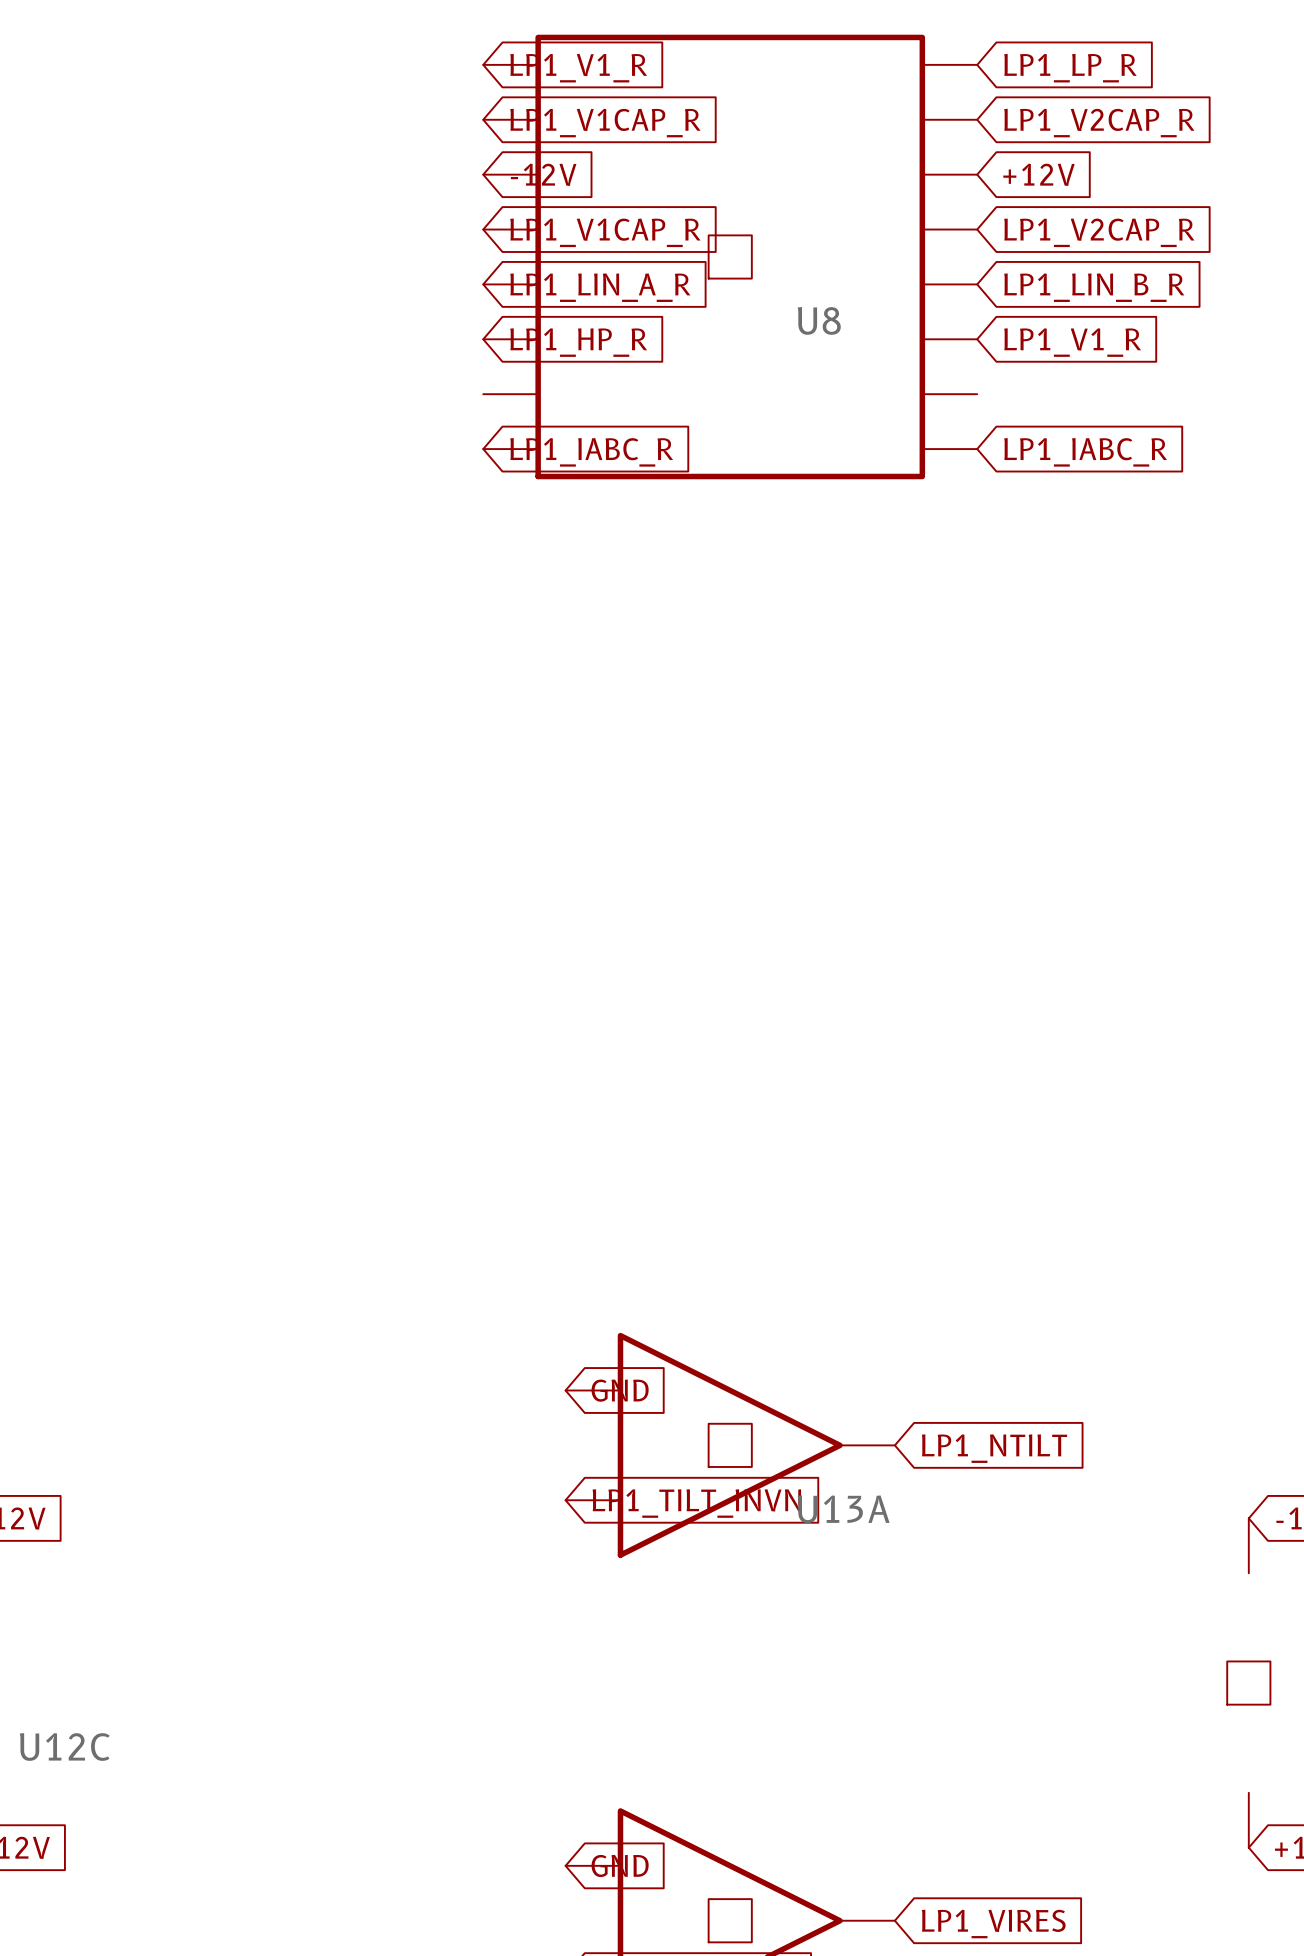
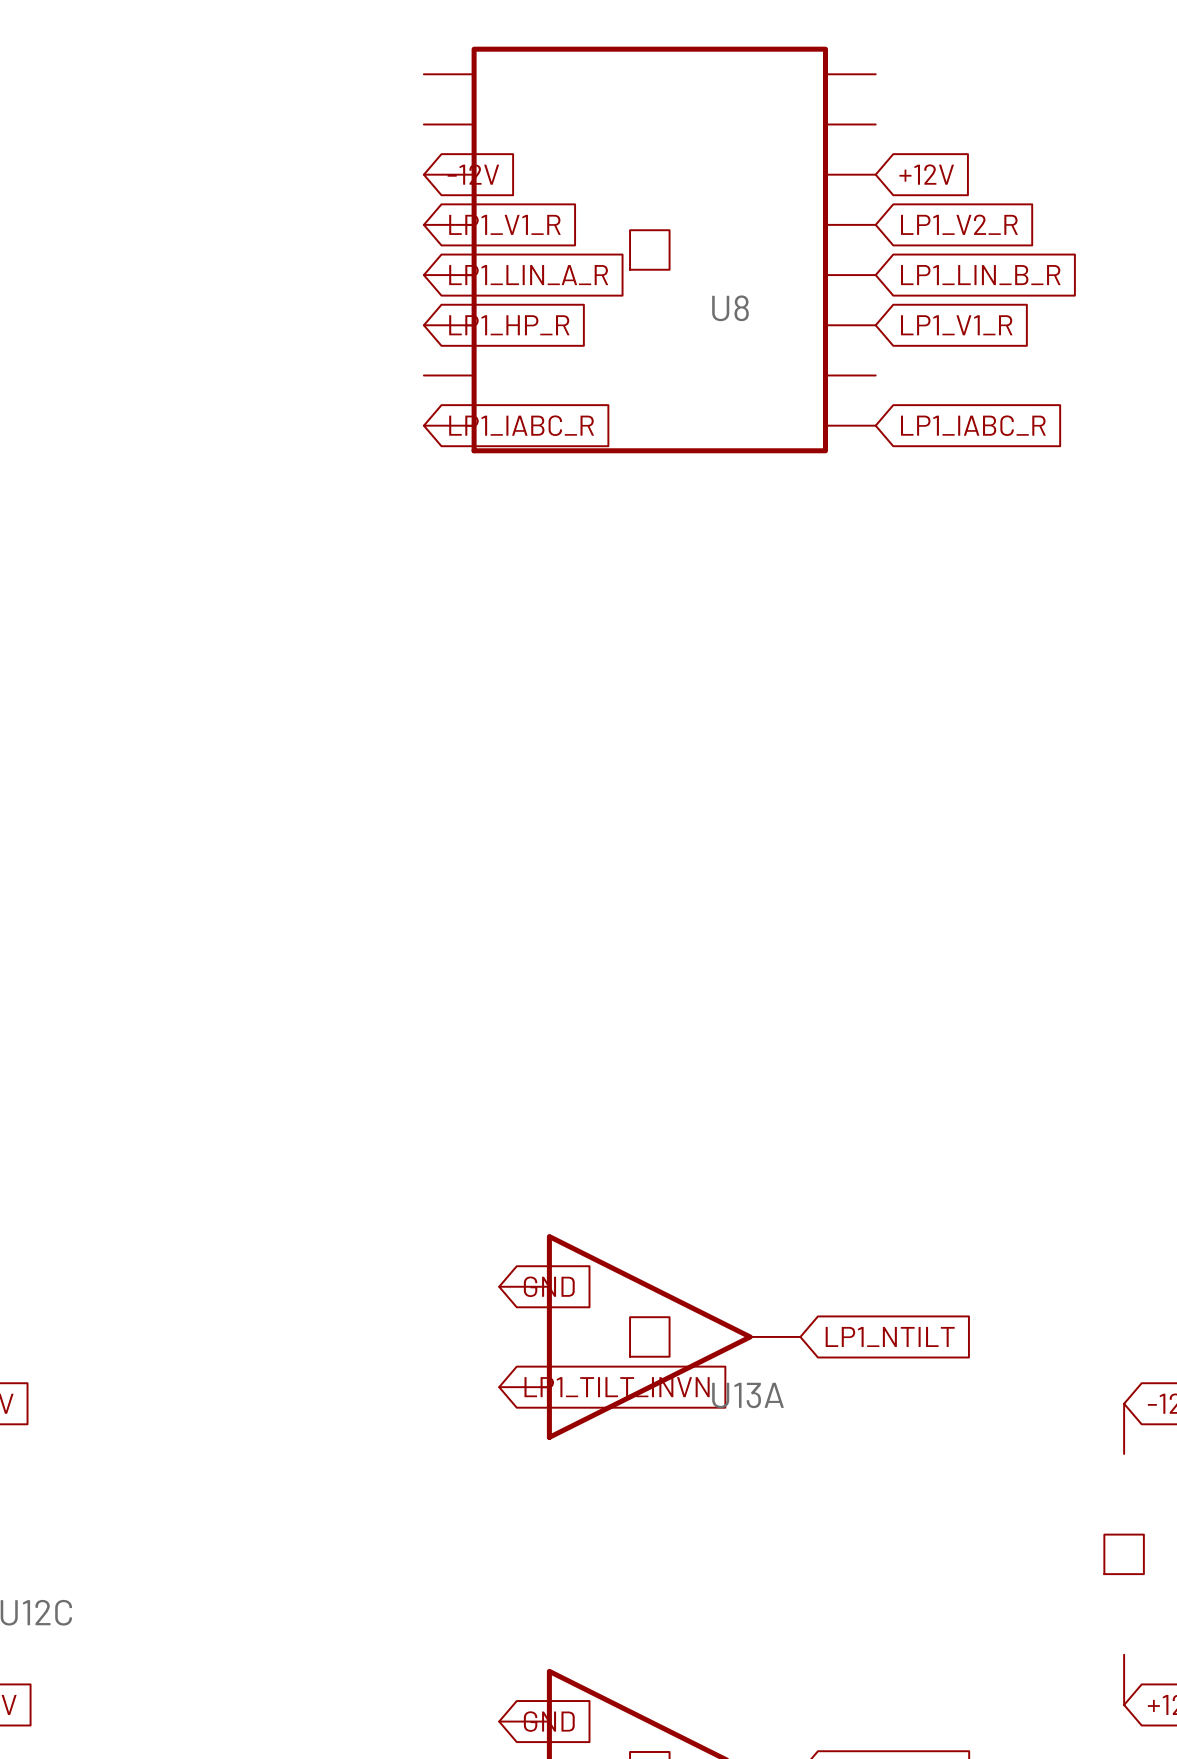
global label: LP1_V1_R (578, 68) -> none
global label: LP1_LP_R (1070, 68) -> none
global label: LP1_V1CAP_R (605, 123) -> none
global label: LP1_V2CAP_R (1099, 123) -> none
global label: LP1_V1CAP_R (605, 232) -> LP1_V1_R (504, 224)
global label: LP1_V2CAP_R (1099, 232) -> LP1_V2_R (959, 224)

